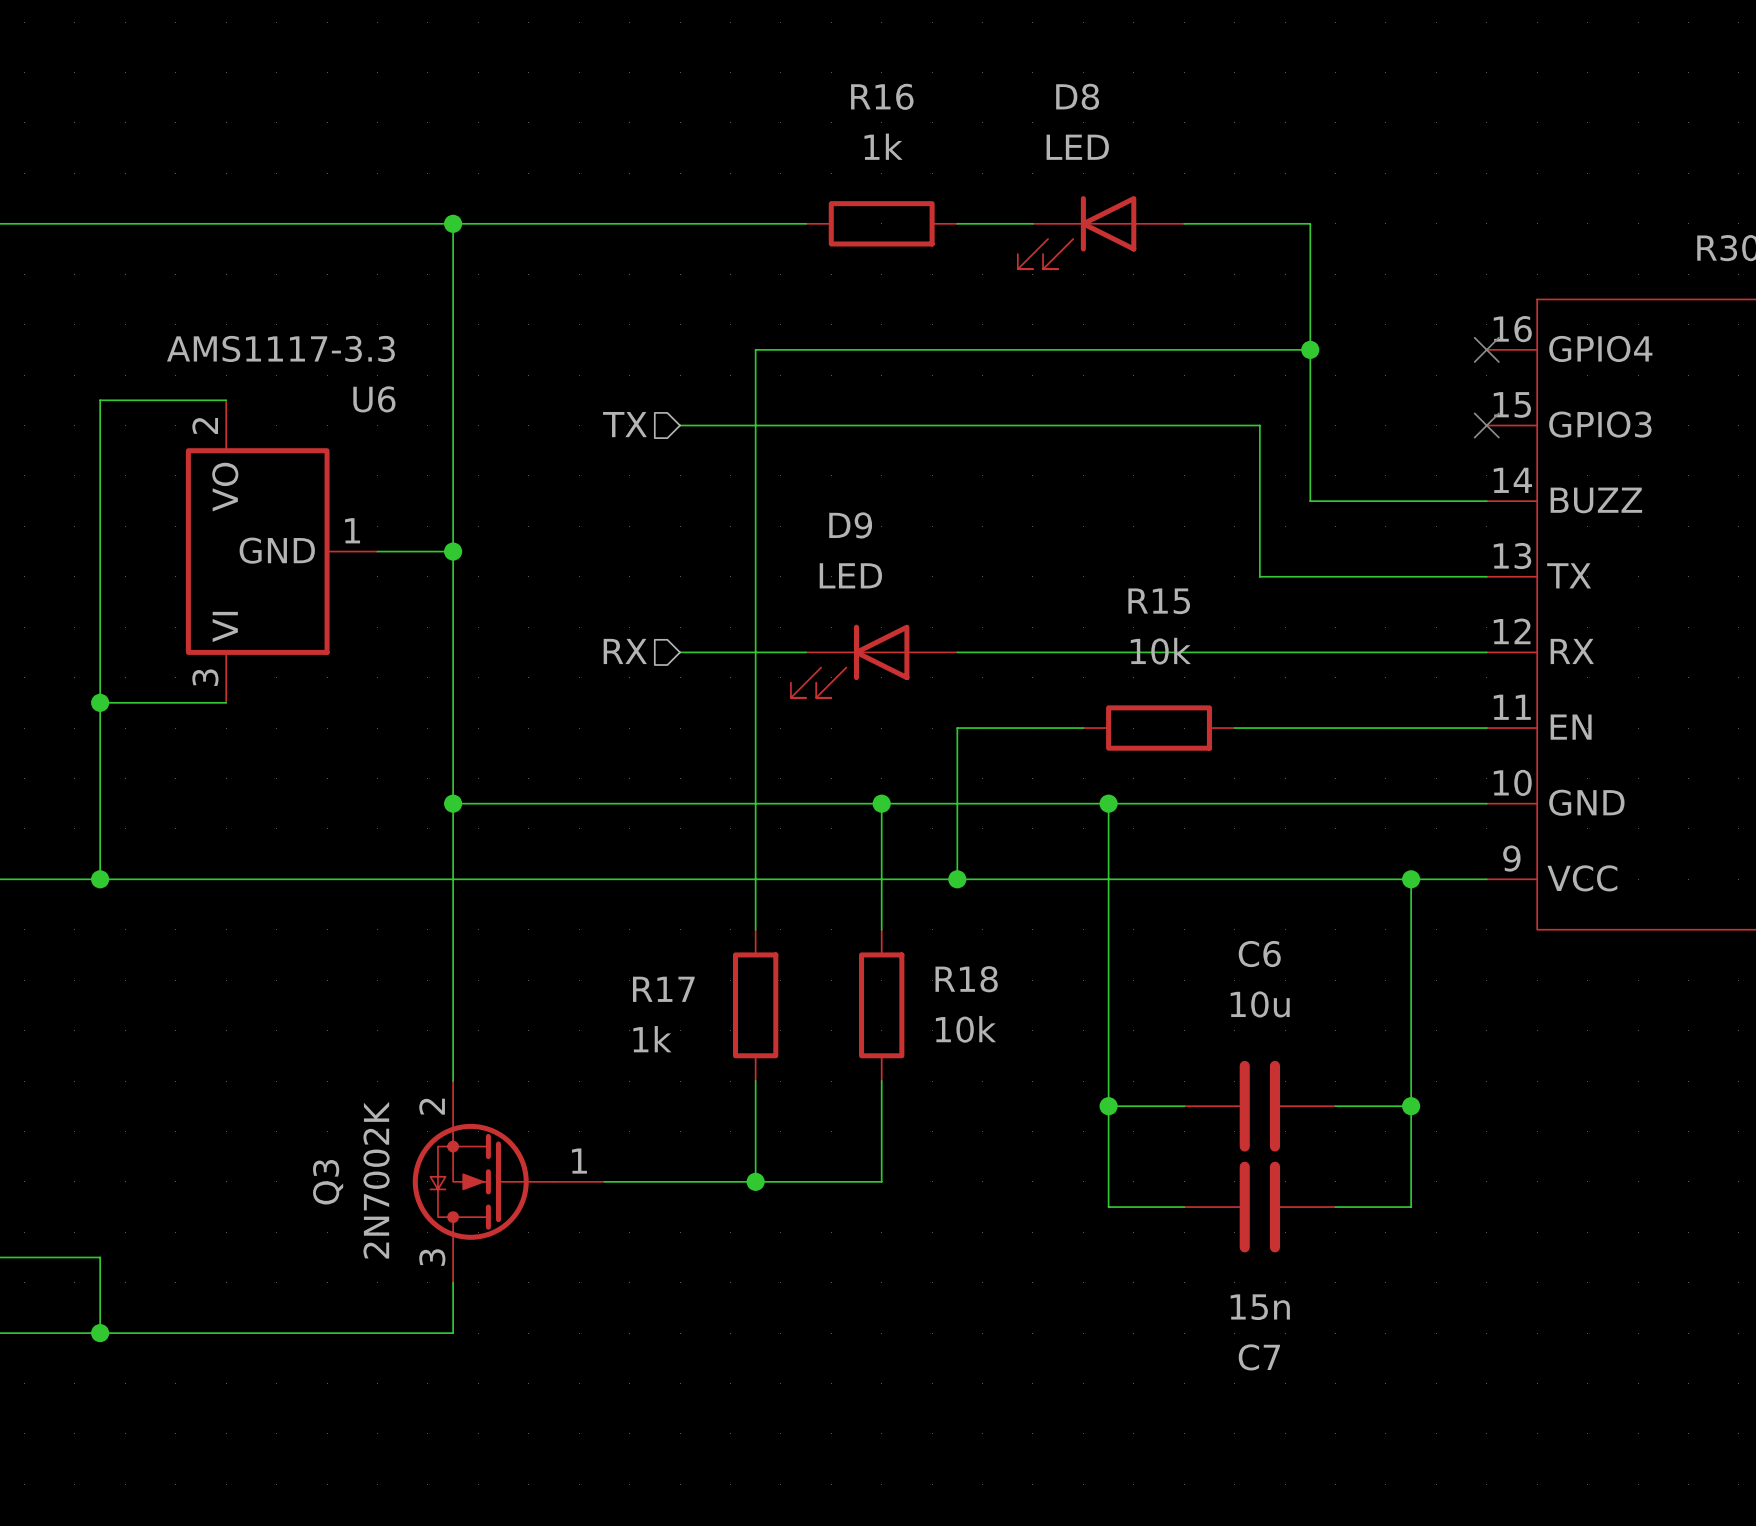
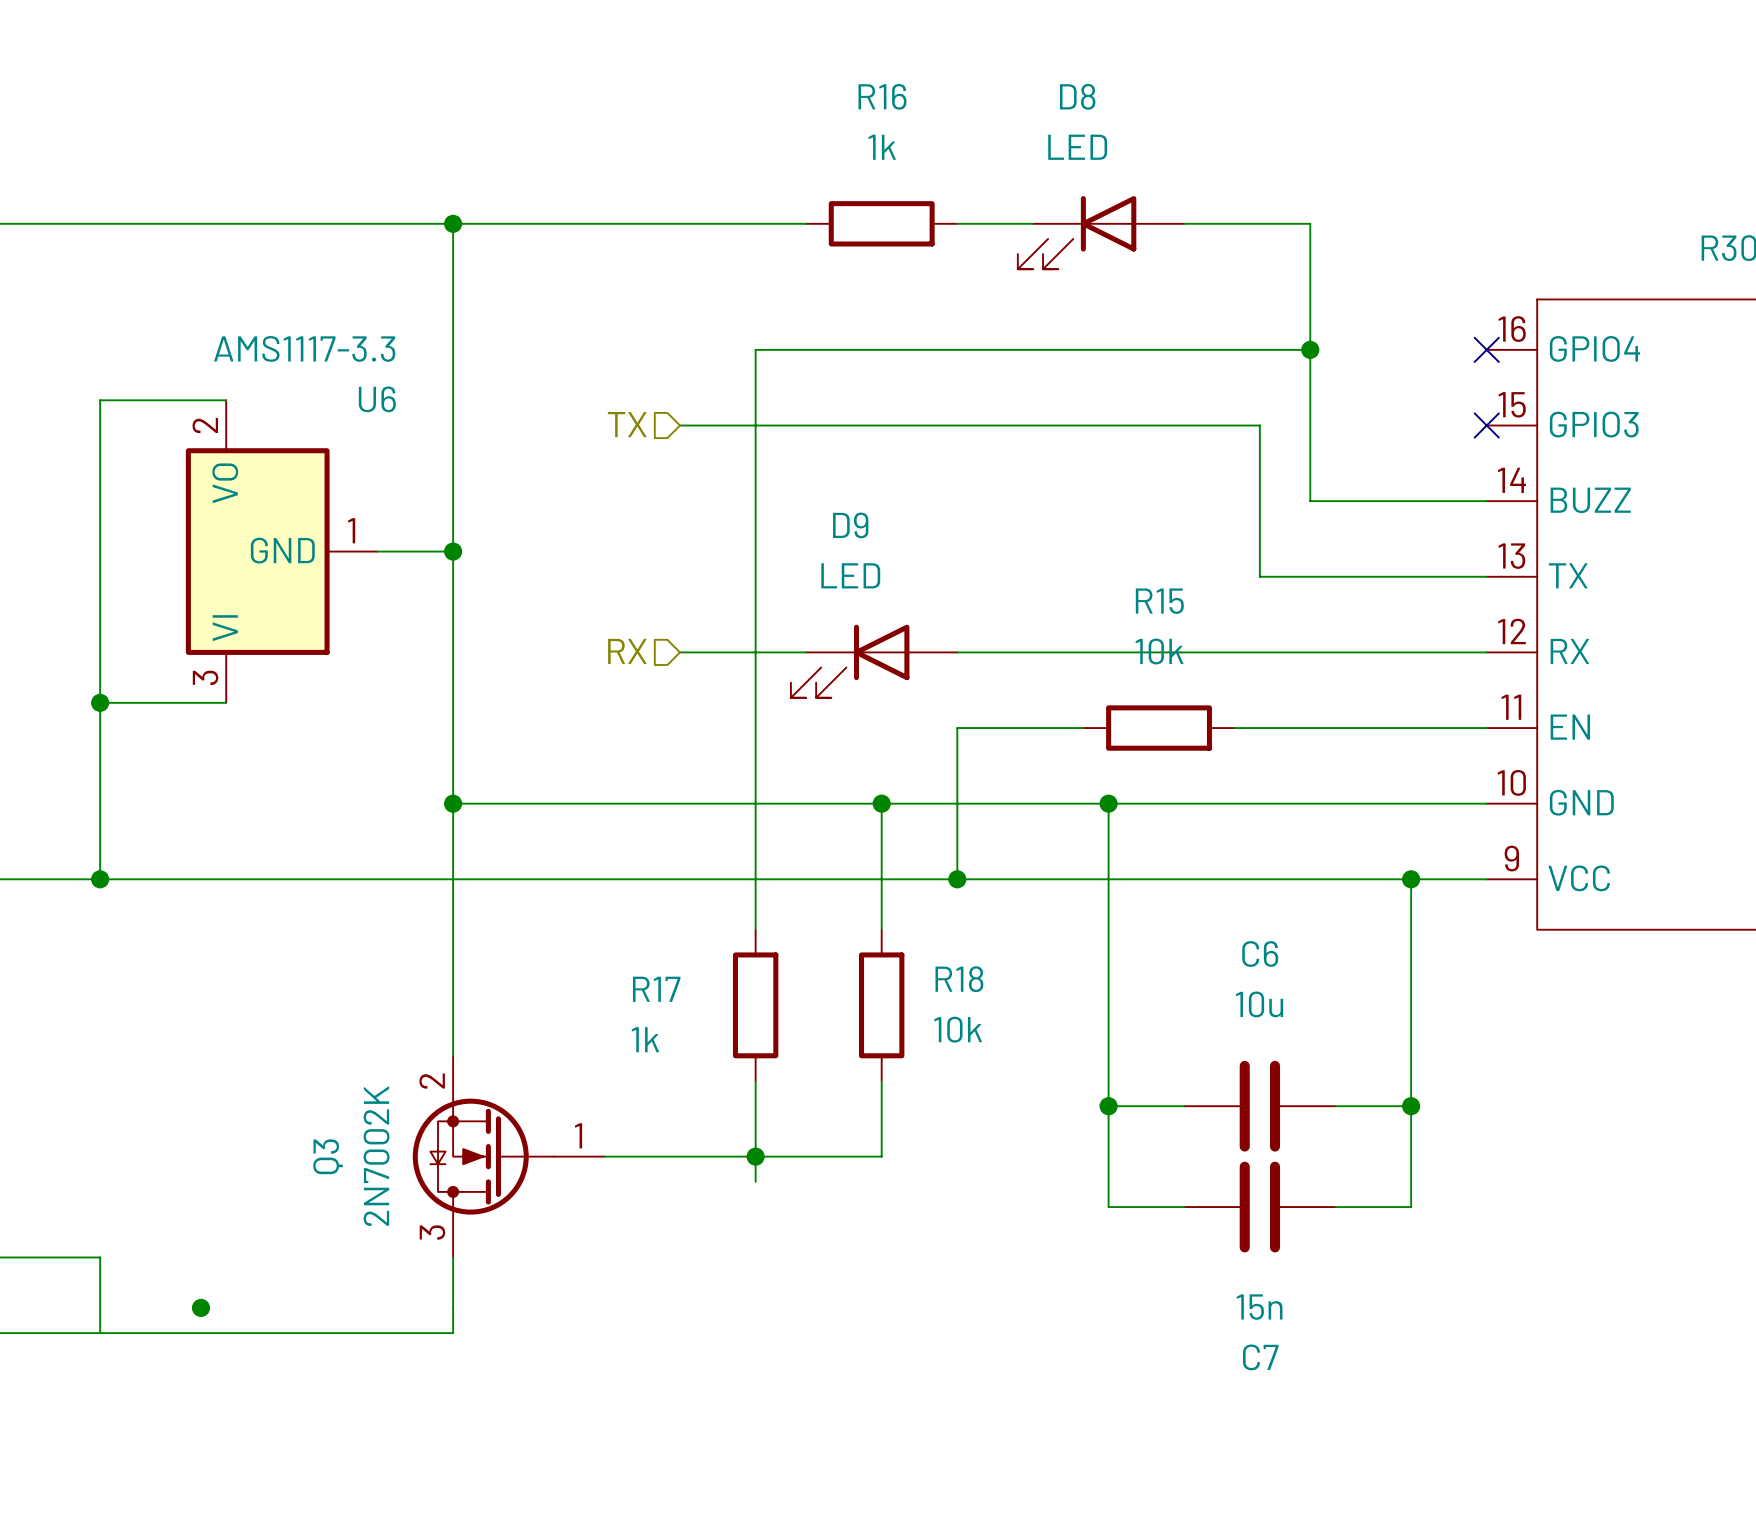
wire: (881, 1156) (881, 1181) (604, 1181) -> (881, 1156) (604, 1156)
Q3 position: (508, 1181) -> (508, 1156)
junction position: (755, 1181) -> (755, 1156)
junction position: (100, 1333) -> (200, 1307)

